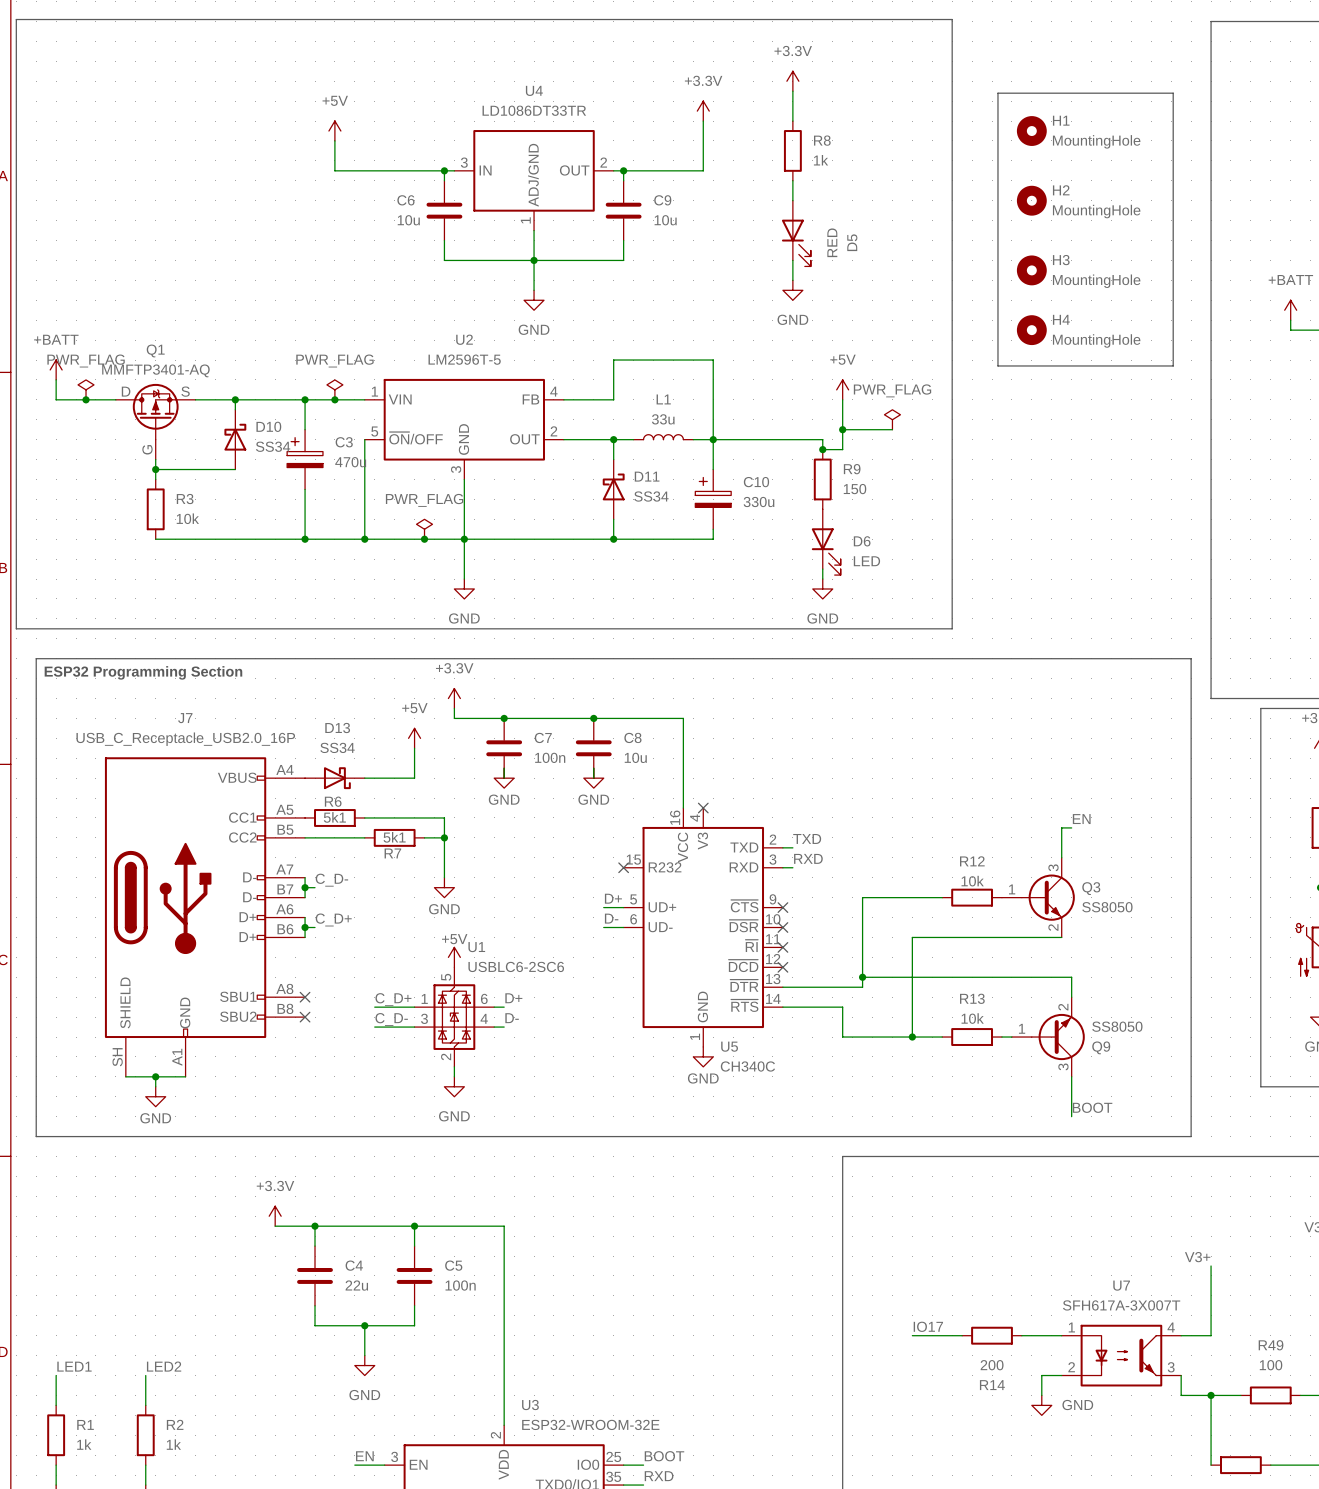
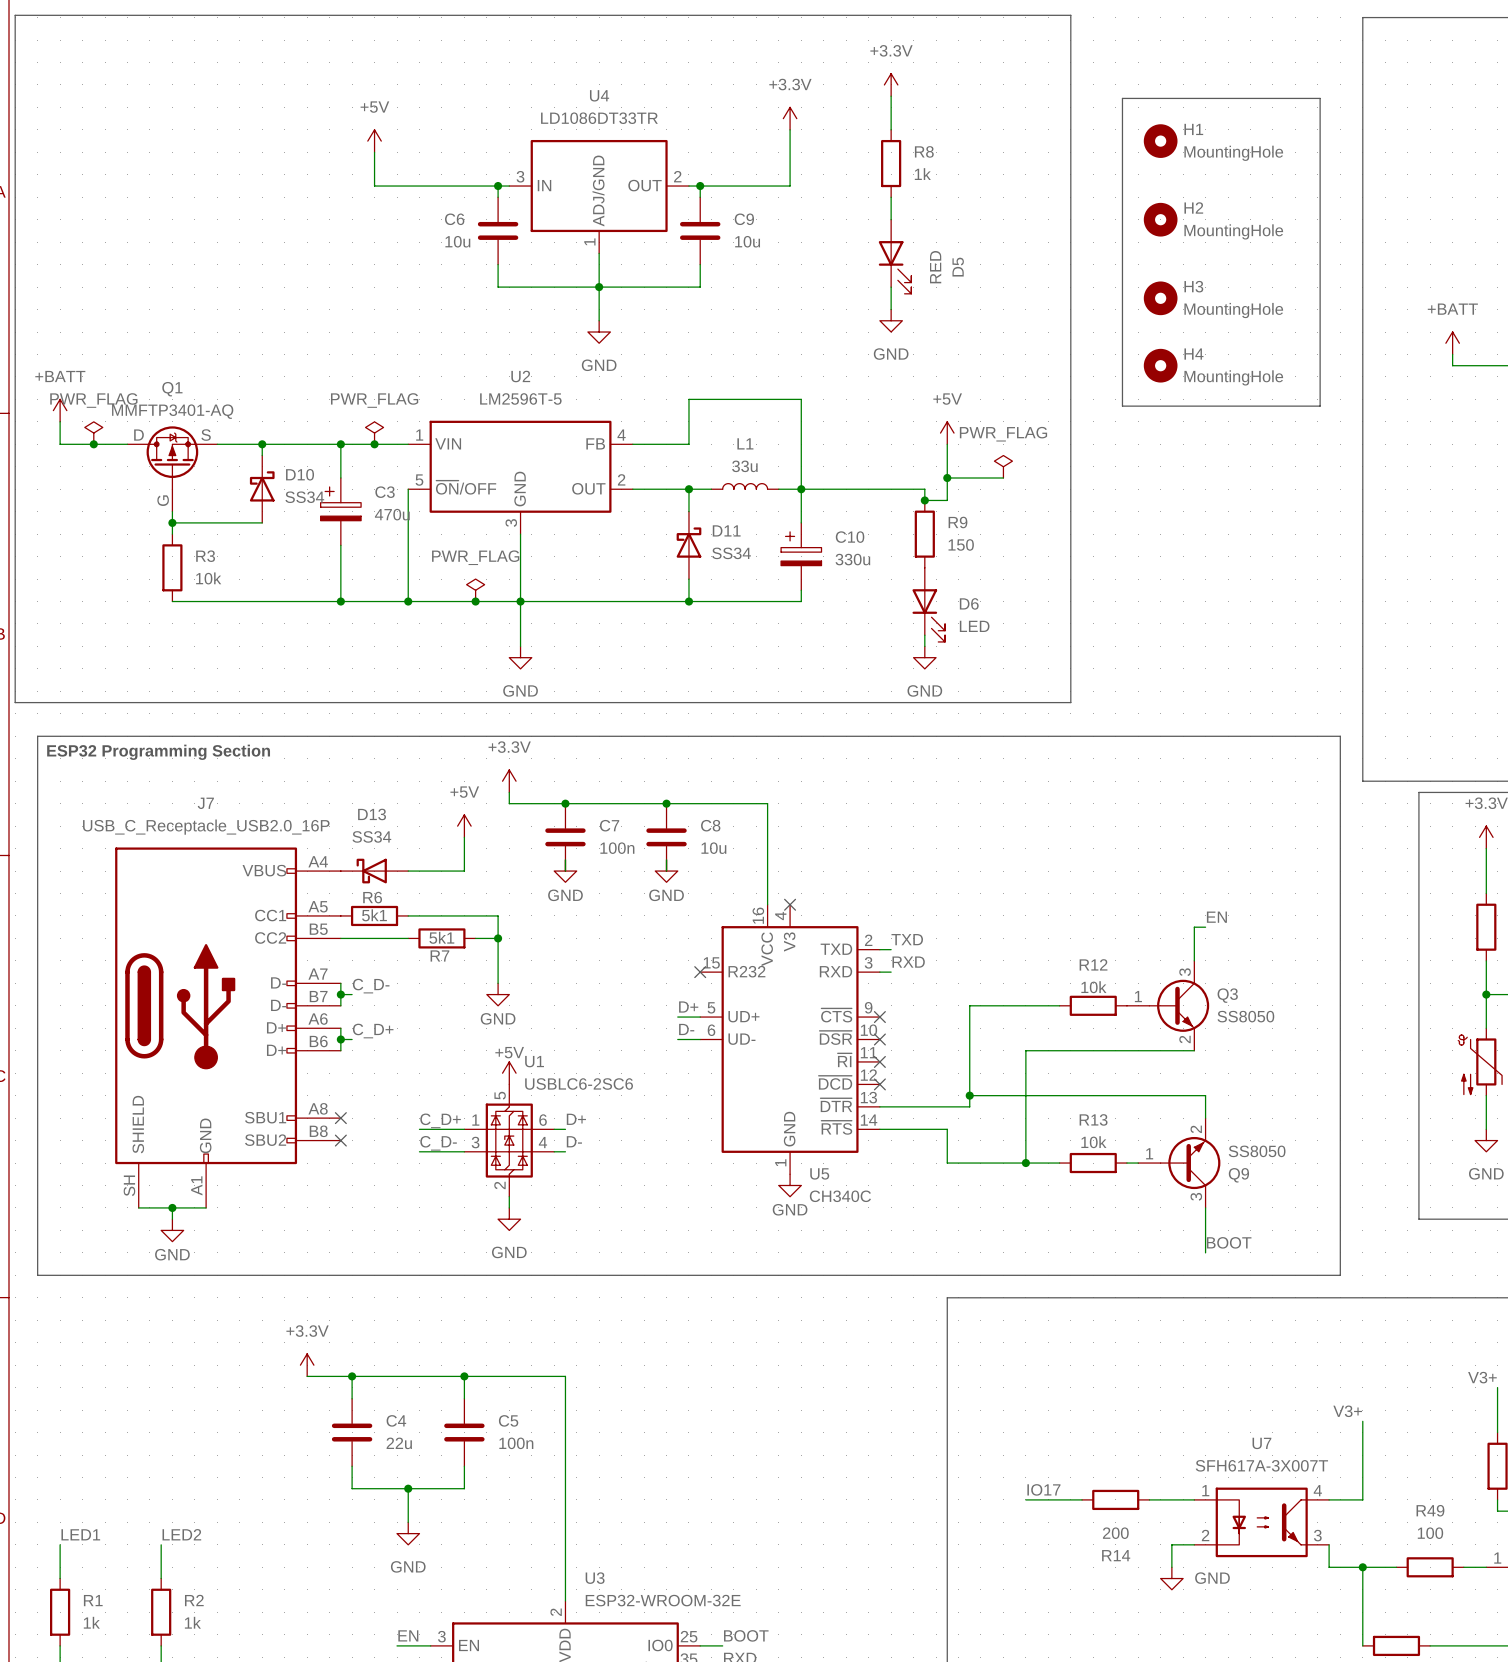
D13 rotation: 0° (337, 778) -> 180° (371, 871)

